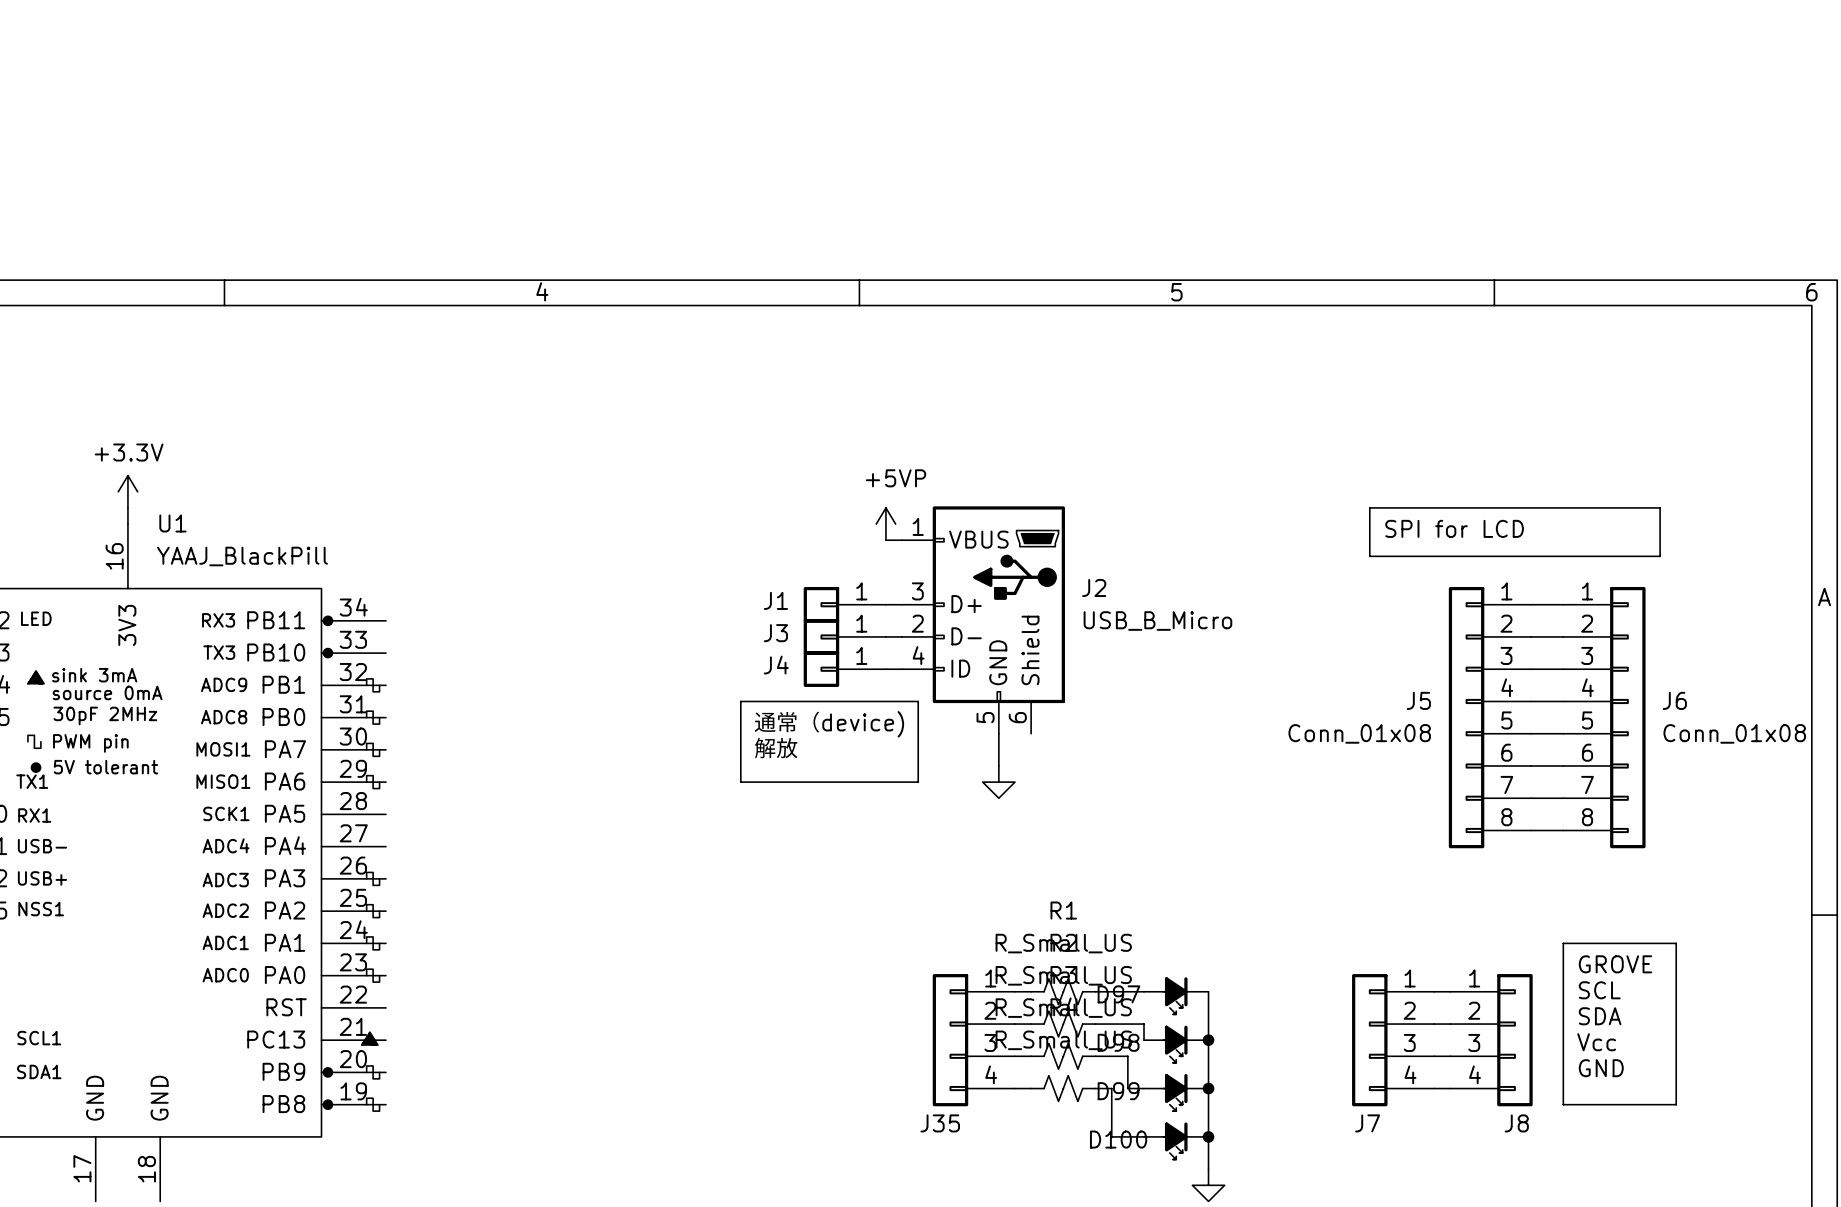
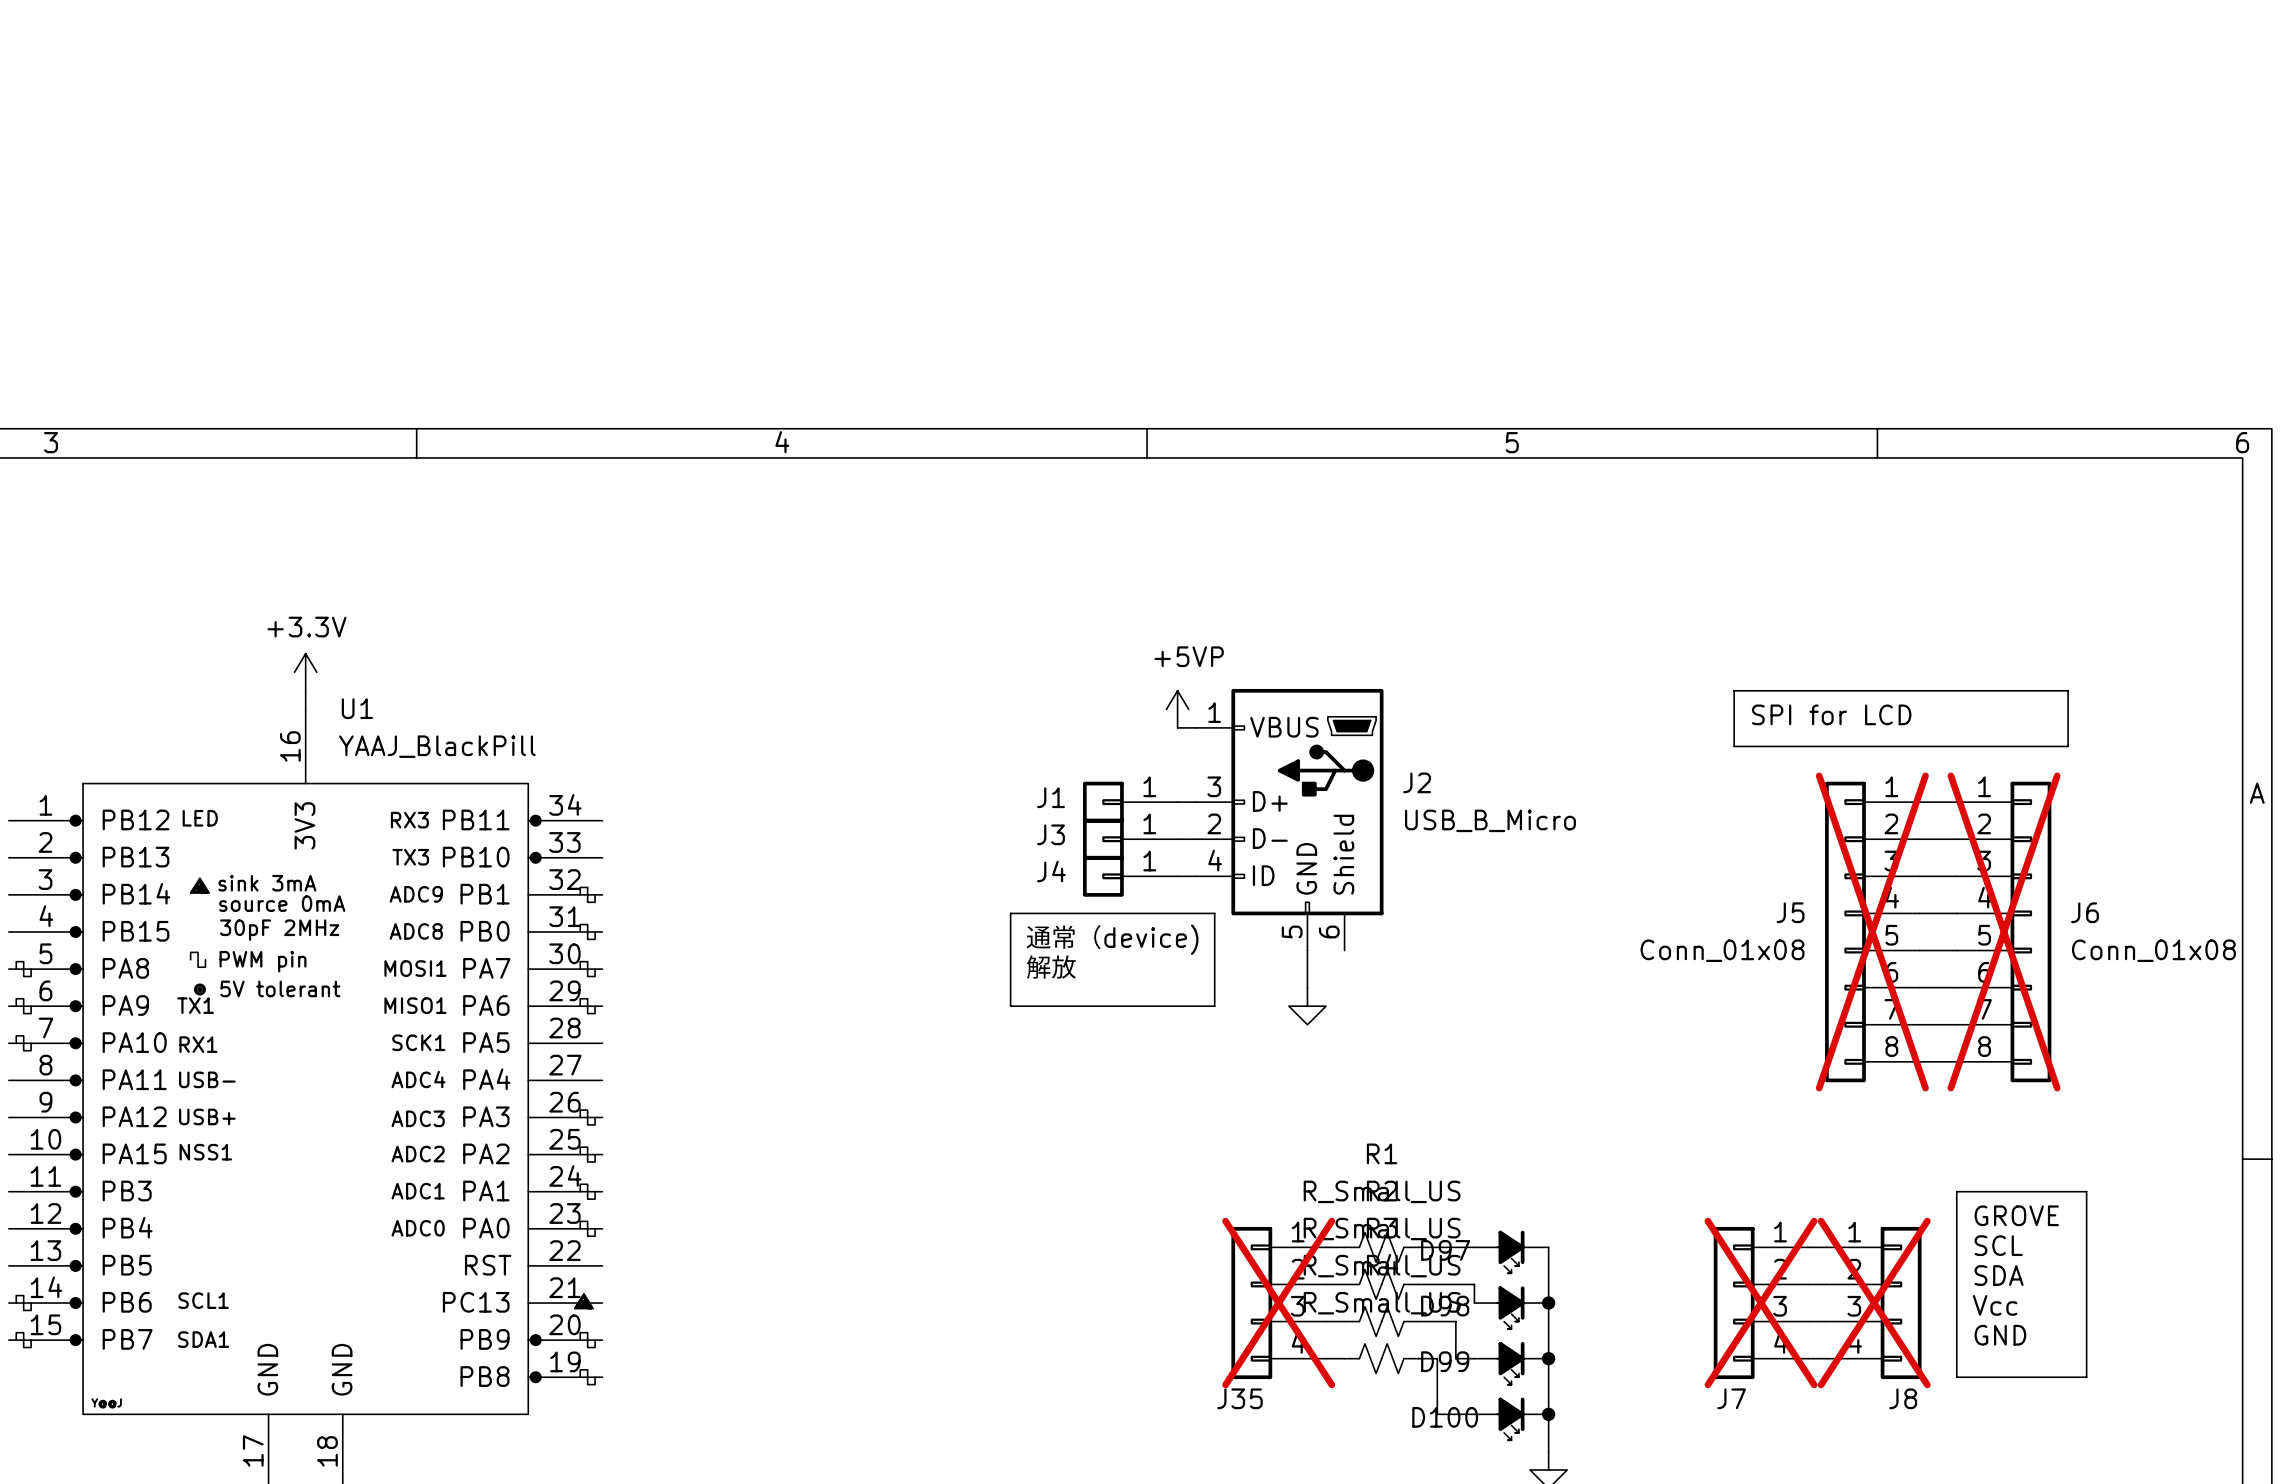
J5 do-not-place cross: none -> (1872, 931)
J6 do-not-place cross: none -> (2004, 931)
J35 do-not-place cross: none -> (1278, 1303)
J7 do-not-place cross: none -> (1761, 1303)
J8 do-not-place cross: none -> (1874, 1303)

